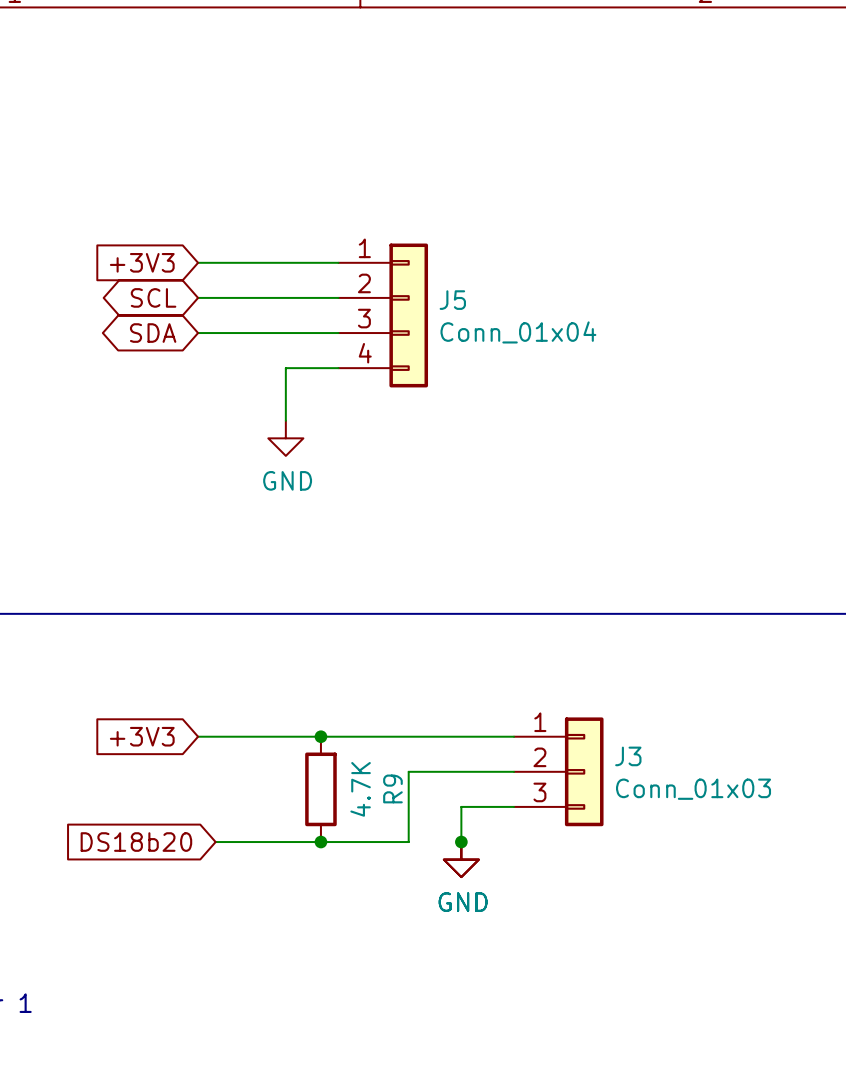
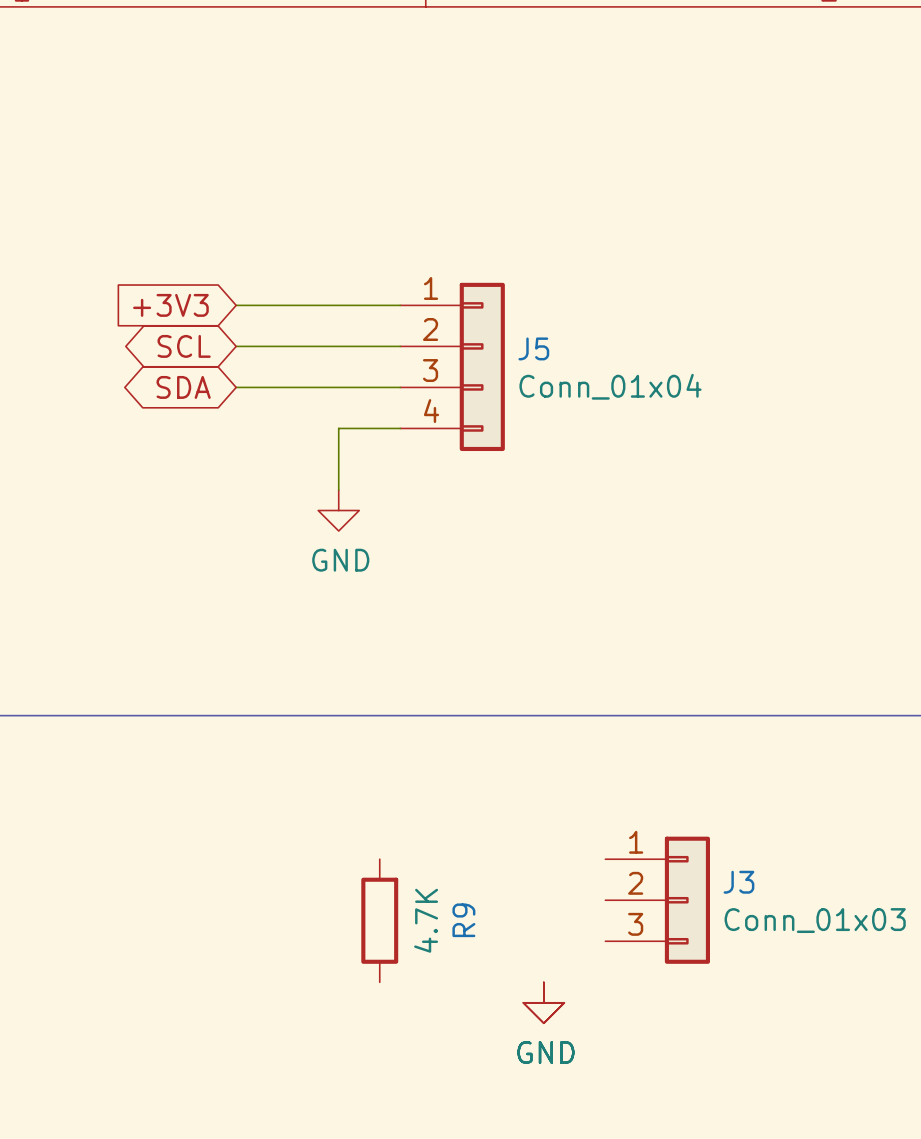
global label: +3V3 (142, 736) -> none
wire: (198, 736) (514, 736) -> none
junction: (320, 736) -> none
wire: (514, 771) (408, 771) (408, 842) (215, 842) -> none
wire: (514, 806) (461, 806) (461, 842) -> none
global label: DS18b20 (136, 842) -> none
junction: (320, 842) -> none
junction: (461, 842) -> none

